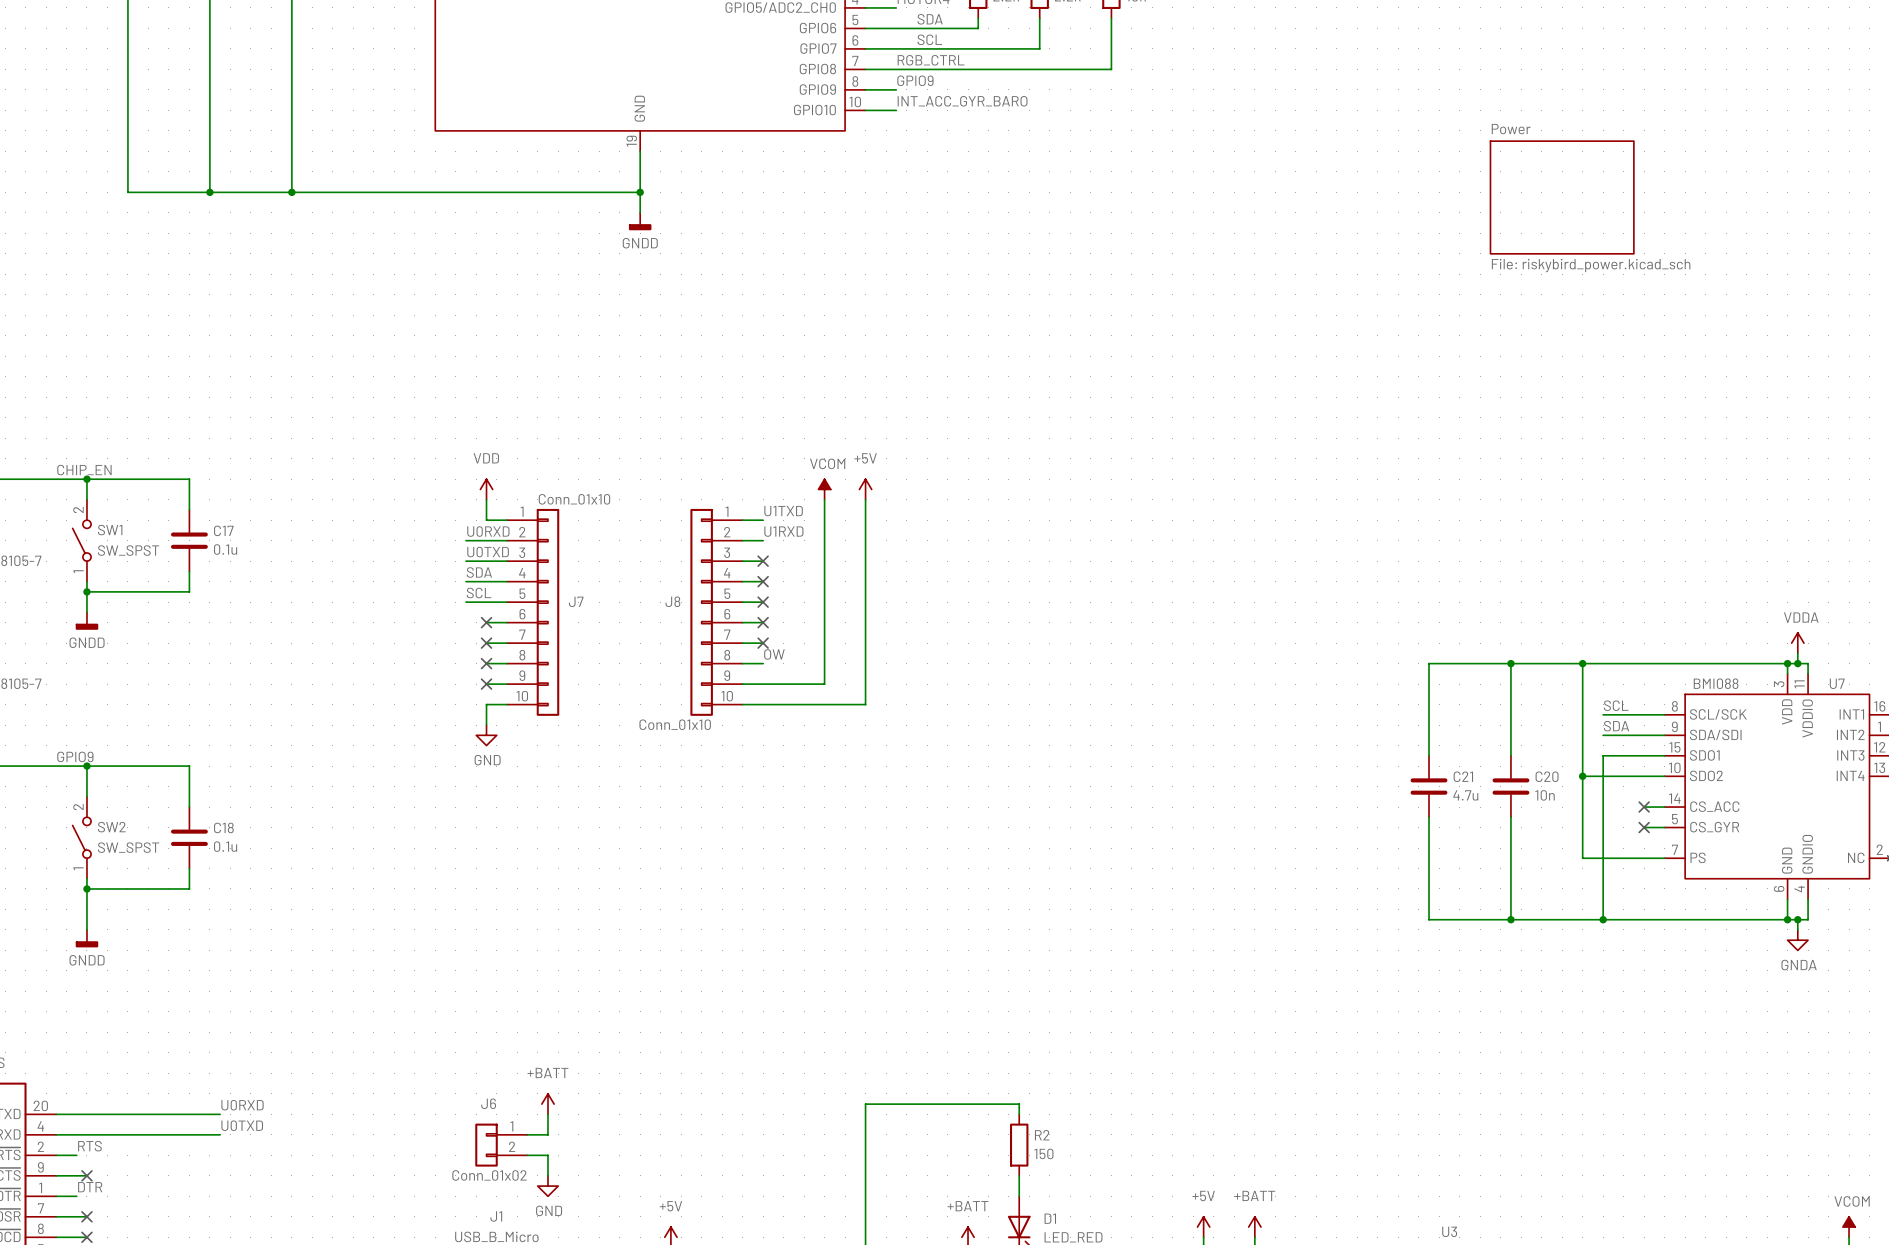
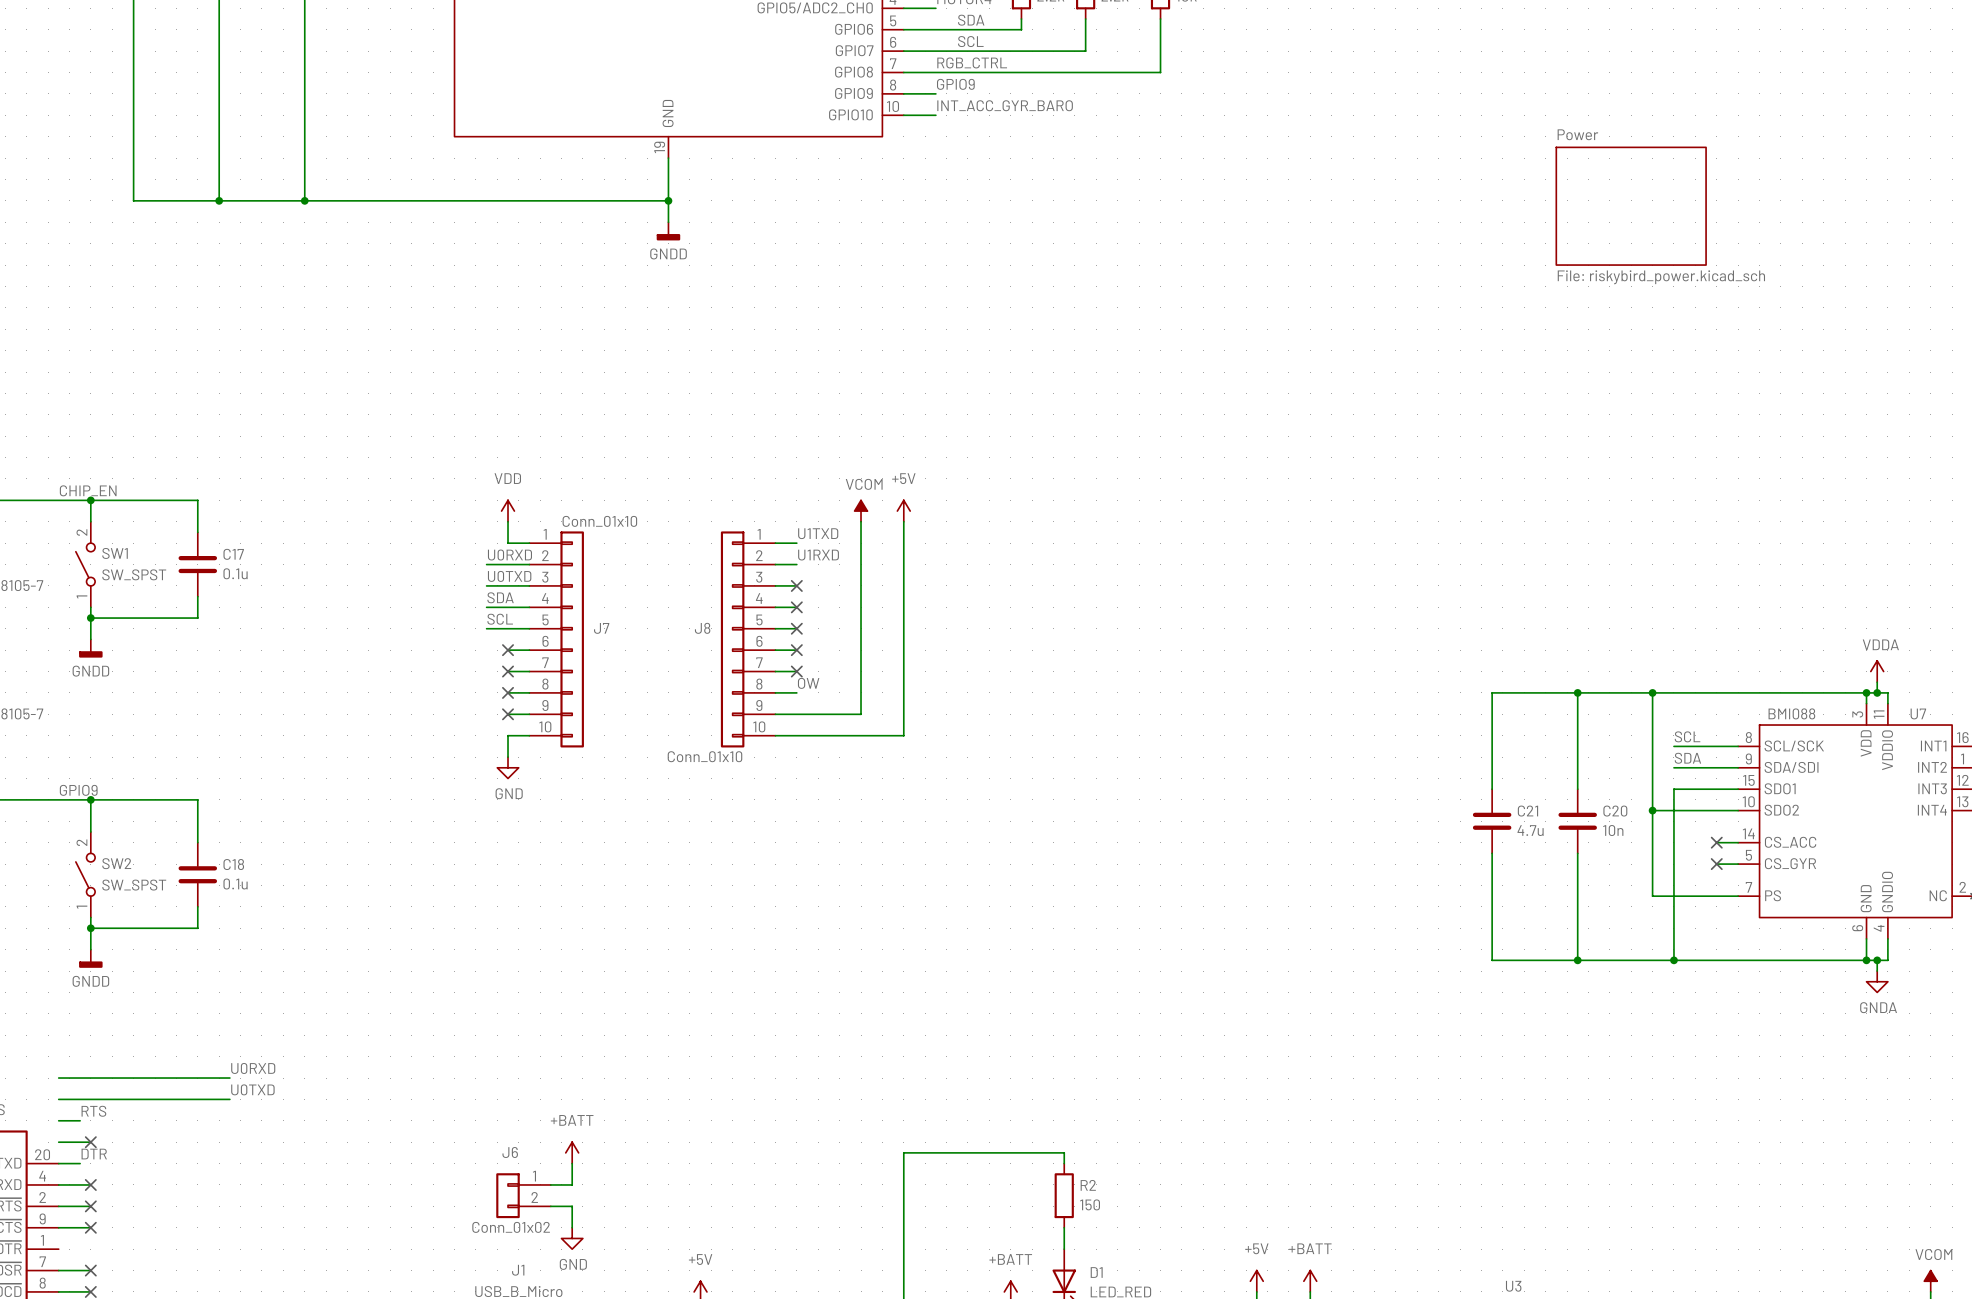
power symbol position: GNDD (86, 938) -> GNDD (90, 958)
wire: none -> (58, 1078) (229, 1078)
wire: none -> (58, 1099) (229, 1099)
wire: none -> (58, 1142) (90, 1142)
no-connect mark: none -> (90, 1142)
label position: U0RXD (242, 1105) -> U0RXD (253, 1068)
wire: (76, 1114) (220, 1114) -> none
label position: U0TXD (242, 1125) -> U0TXD (252, 1089)
wire: (86, 1134) (220, 1134) -> none
no-connect mark: none -> (90, 1184)
label position: RTS (89, 1146) -> RTS (93, 1111)
wire: none -> (80, 1206) (90, 1206)
no-connect mark: none -> (90, 1206)
label position: DTR (90, 1187) -> DTR (94, 1154)
wire: (56, 1196) (76, 1196) -> (58, 1120) (80, 1120)

